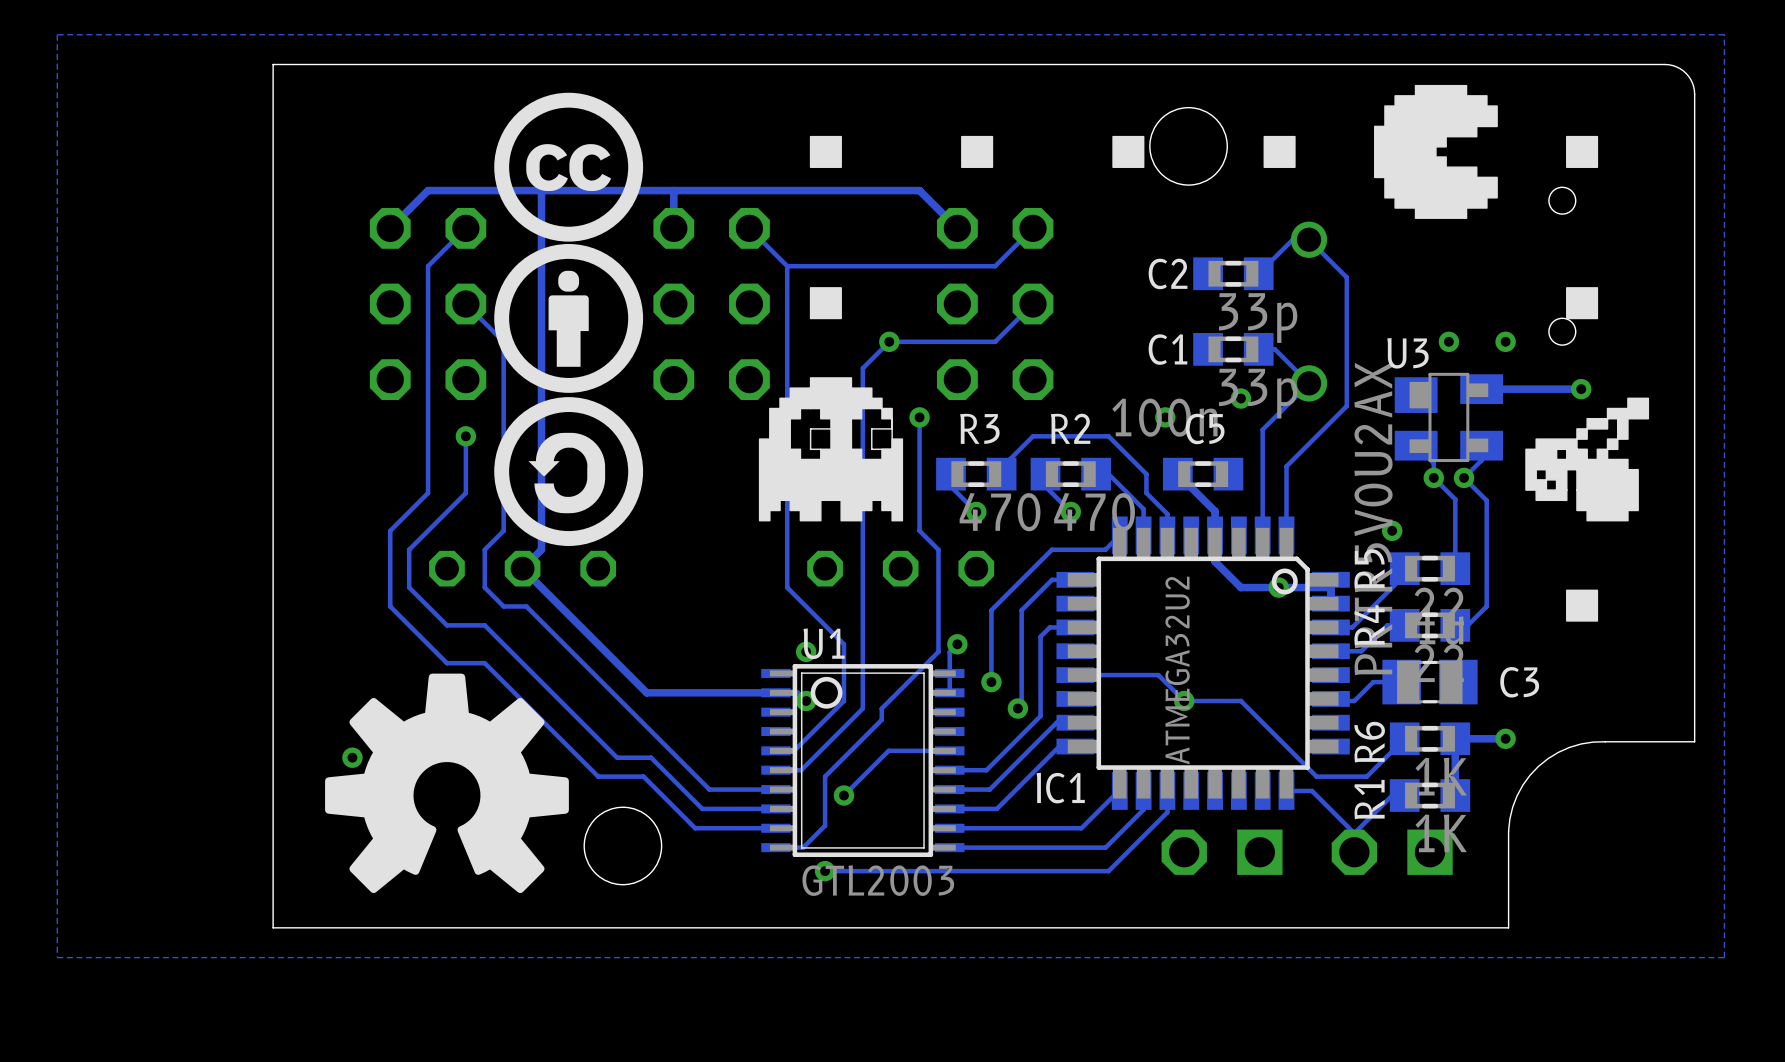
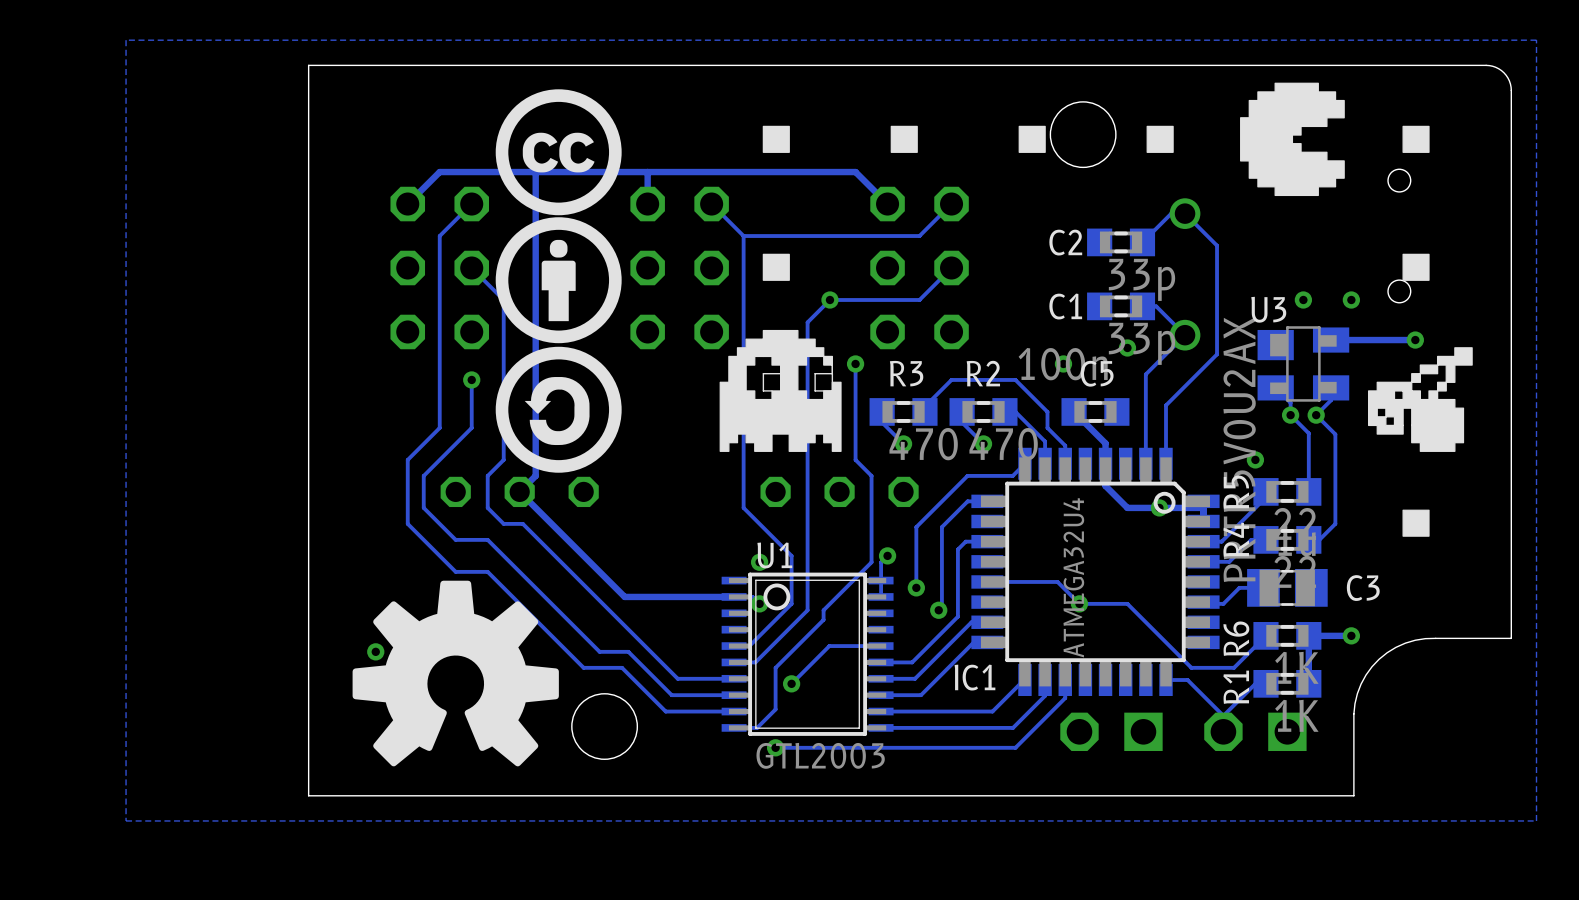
IC1 value: ATMEGA32U2 (1177, 670) -> ATMEGA32U4 (1073, 577)

